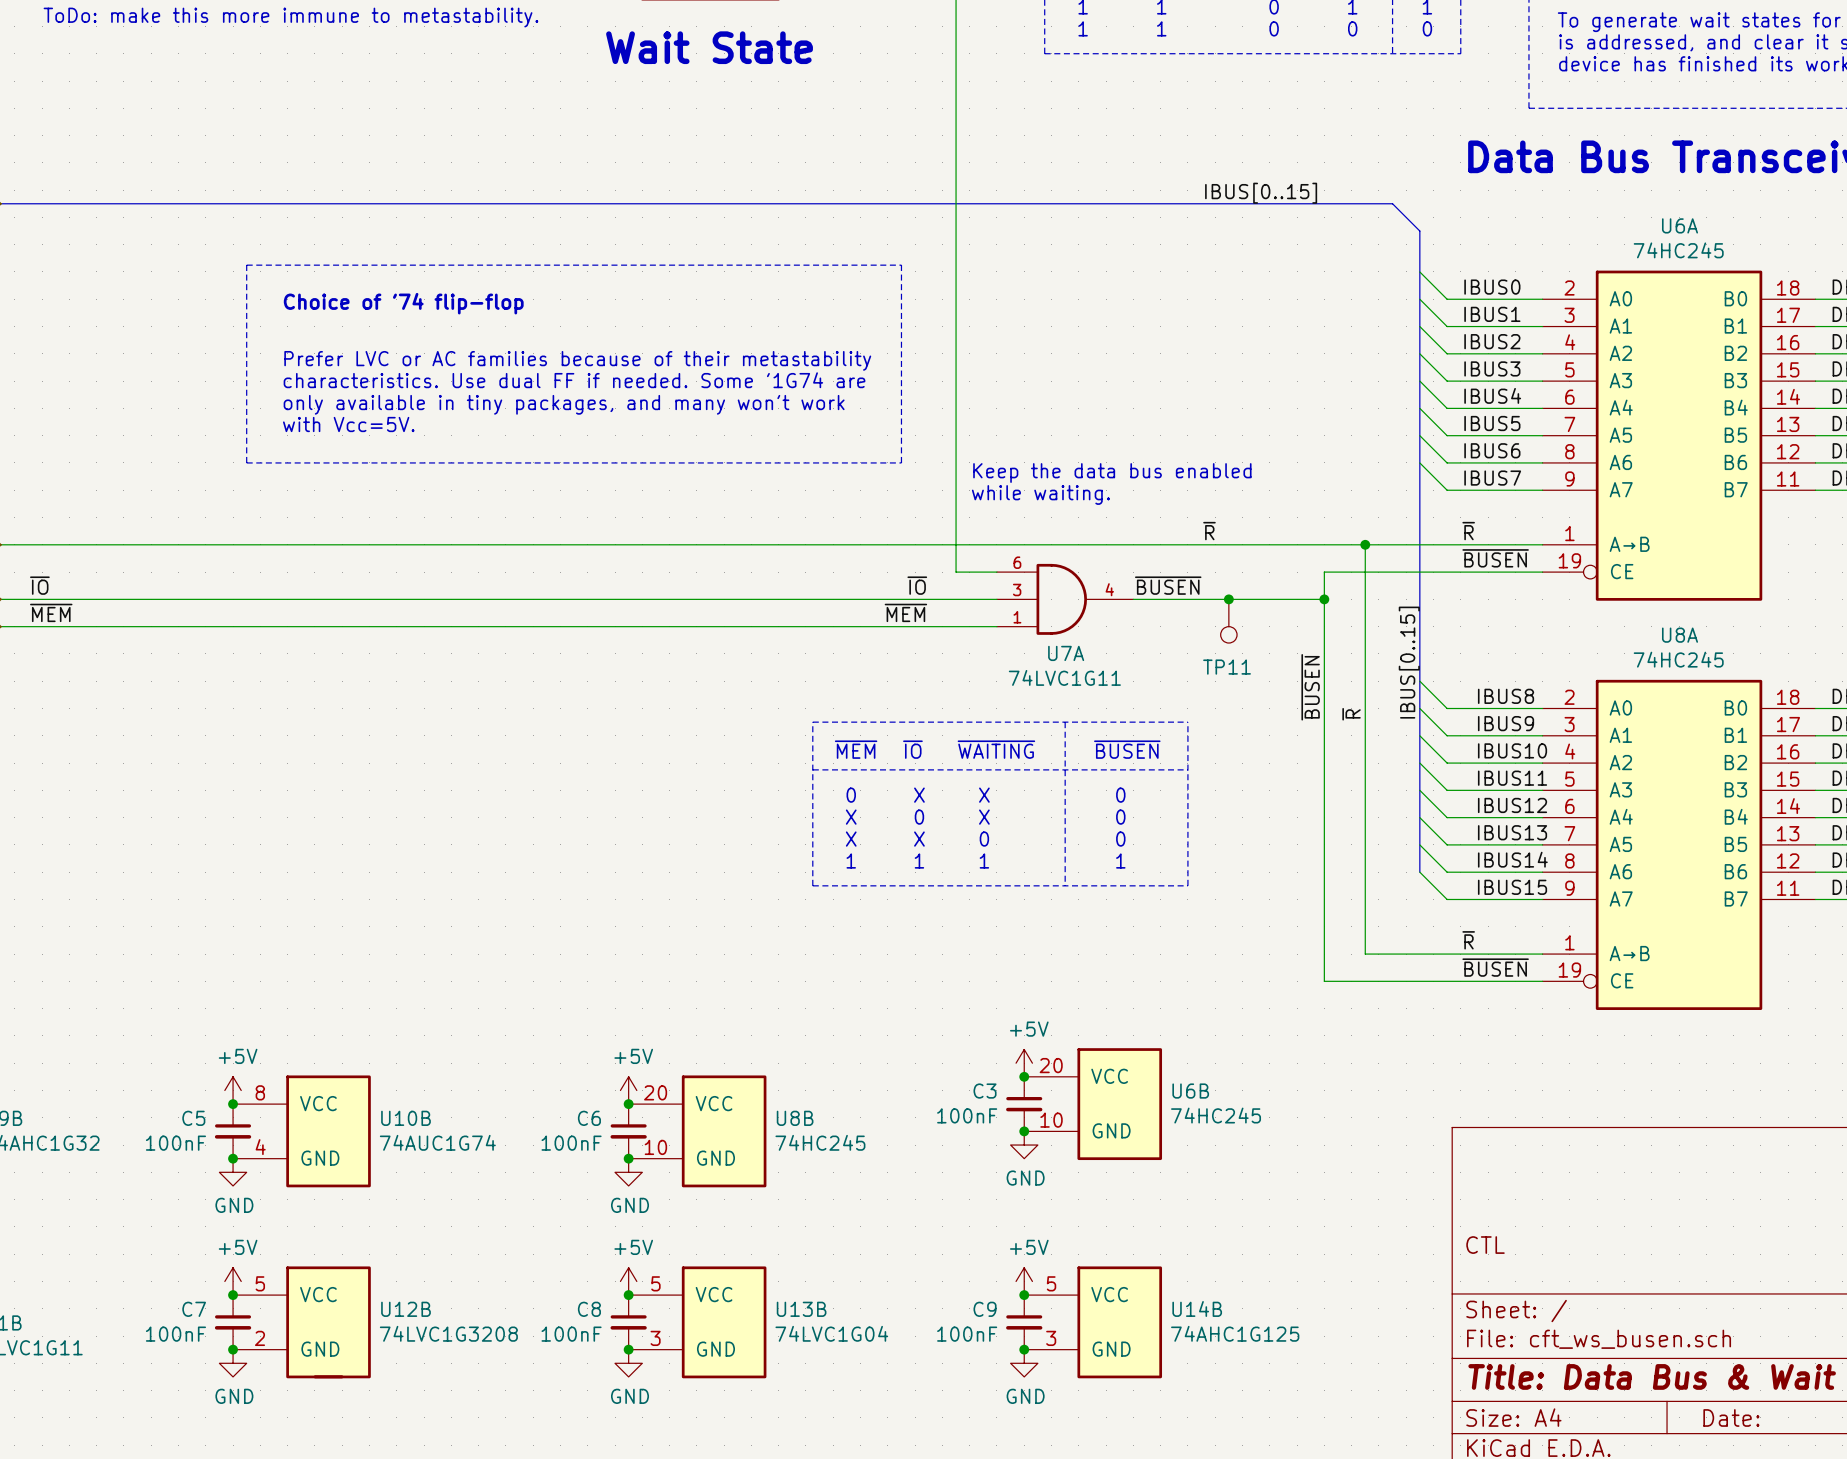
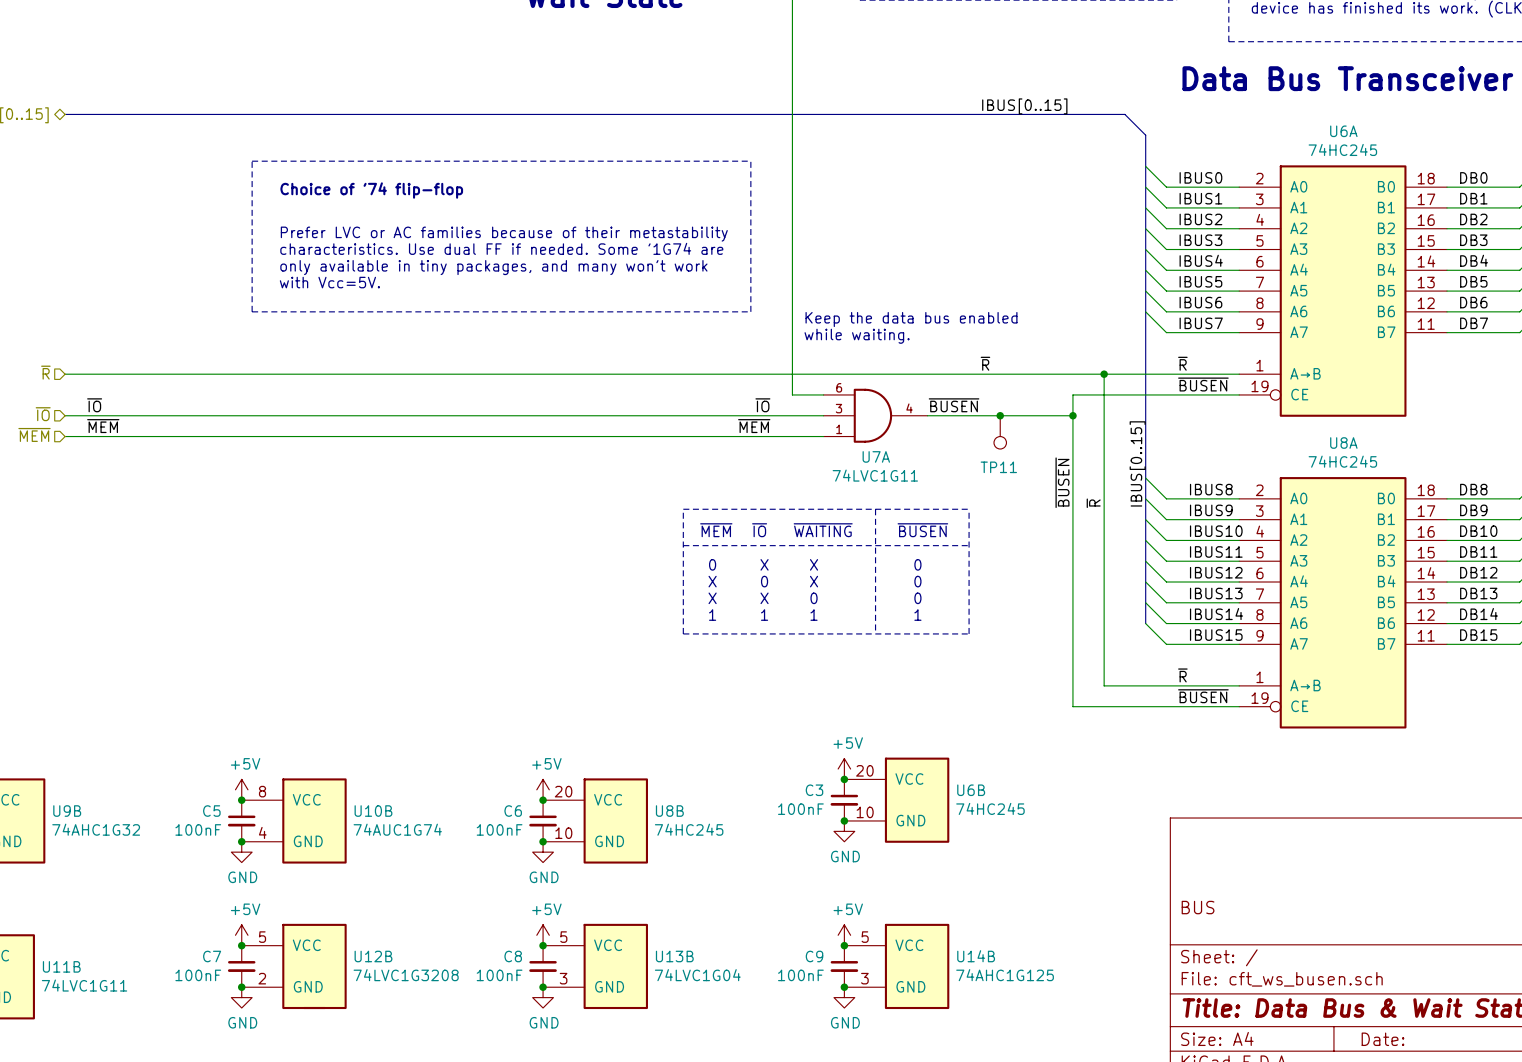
title block: CTL (1485, 1245) -> BUS (1198, 907)

